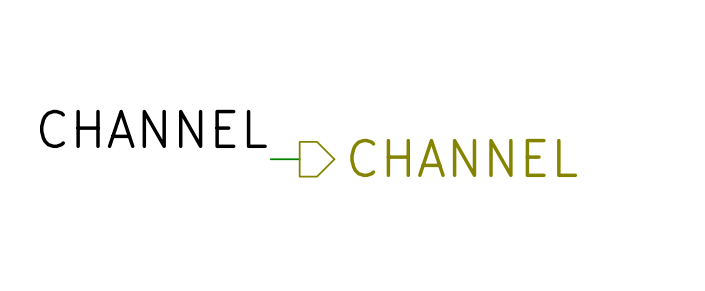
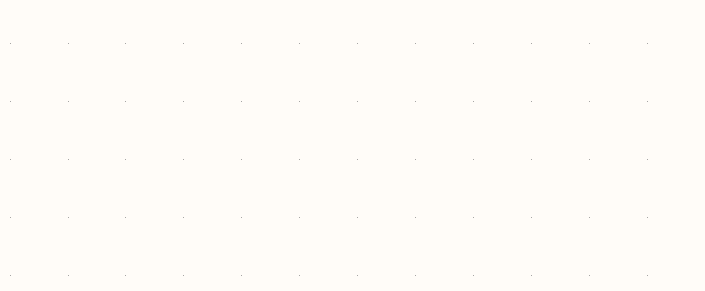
label: CHANNEL (153, 128) -> none
hierarchical label: CHANNEL (463, 157) -> none
wire: (270, 159) (299, 159) -> none

